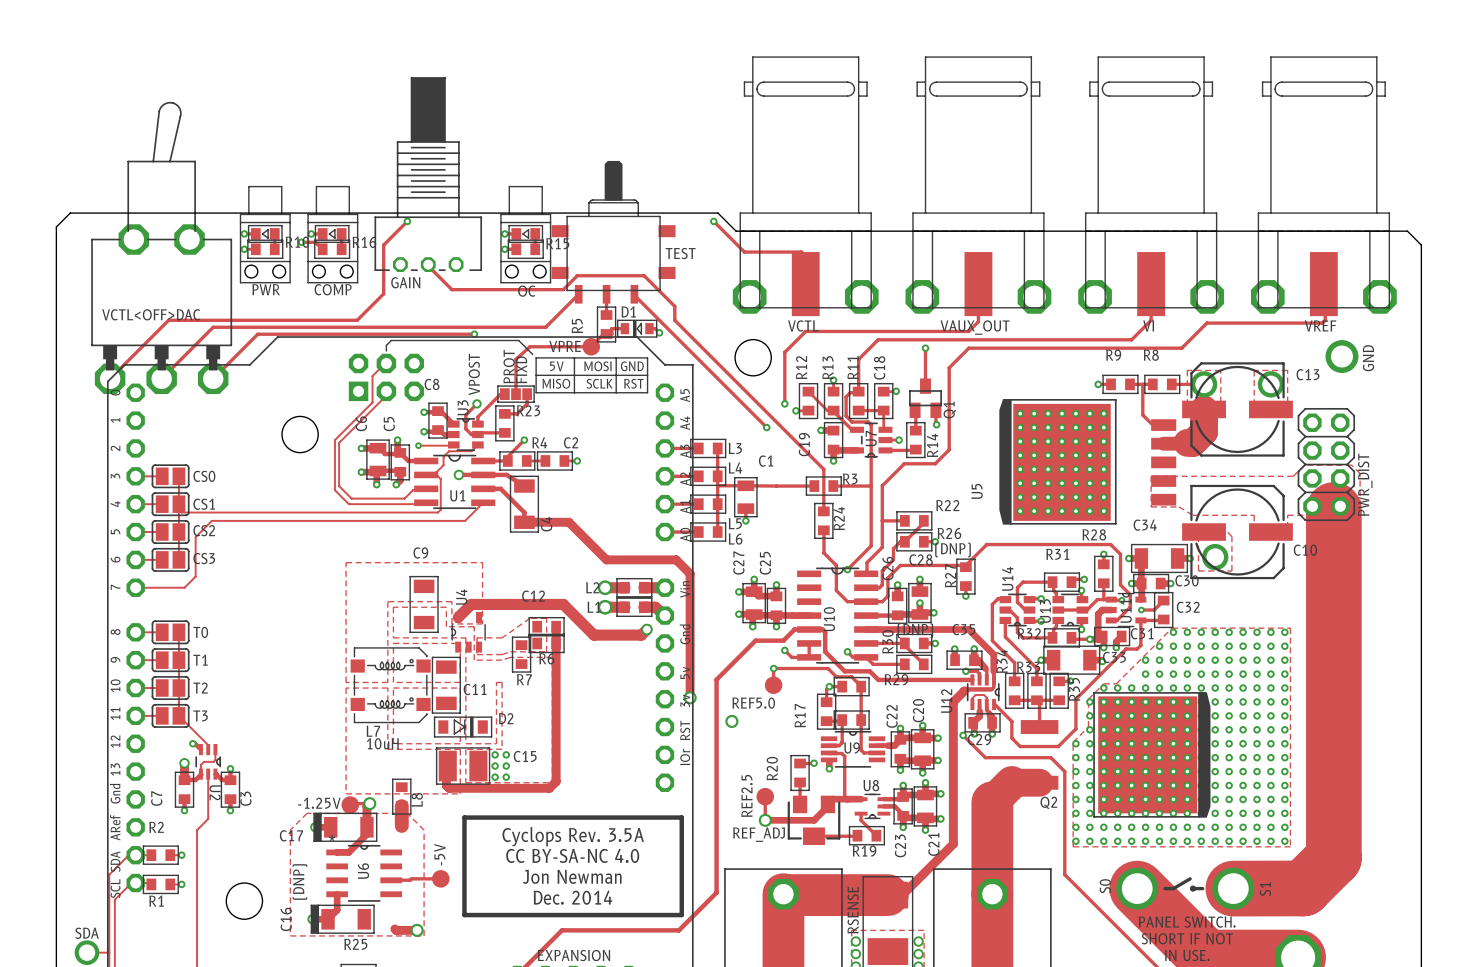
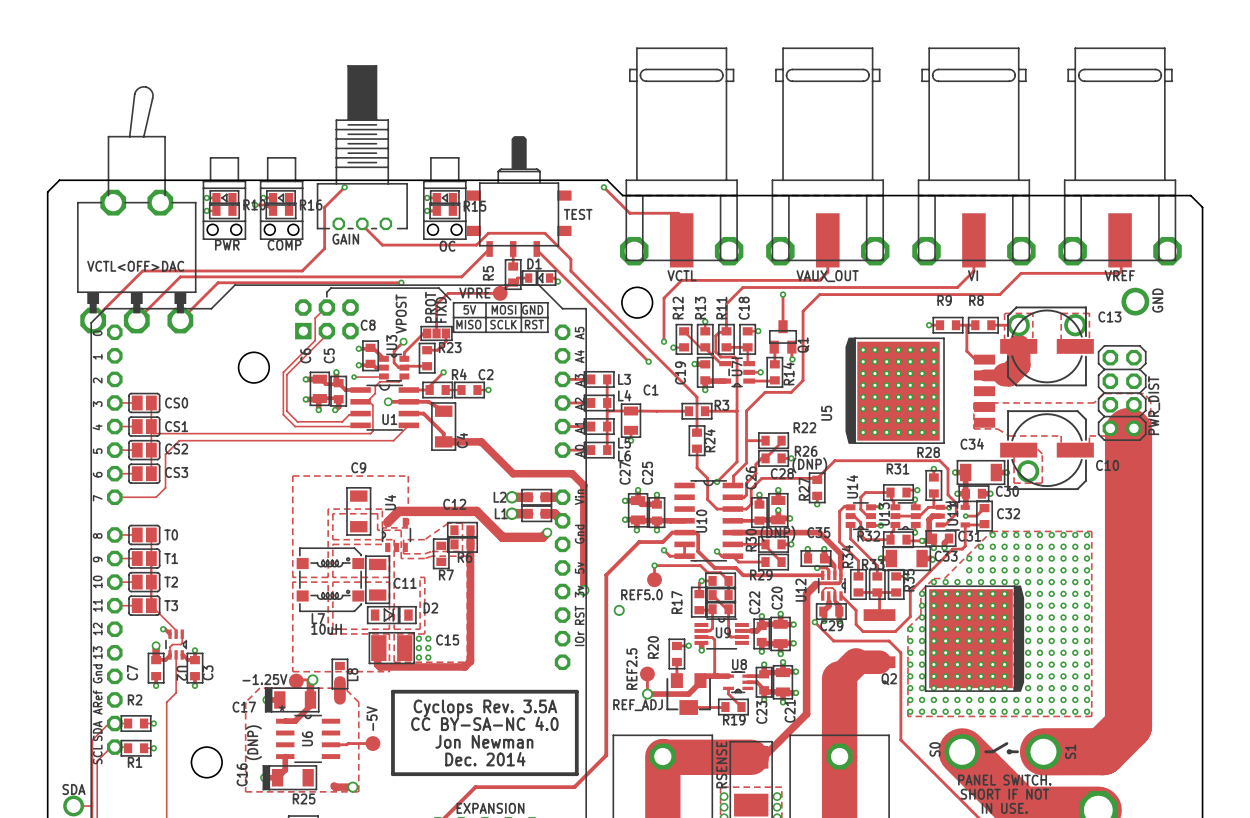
track: none -> (712, 595) (726, 609)
part: none -> (720, 595)
track: (861, 703) (861, 720) -> none

